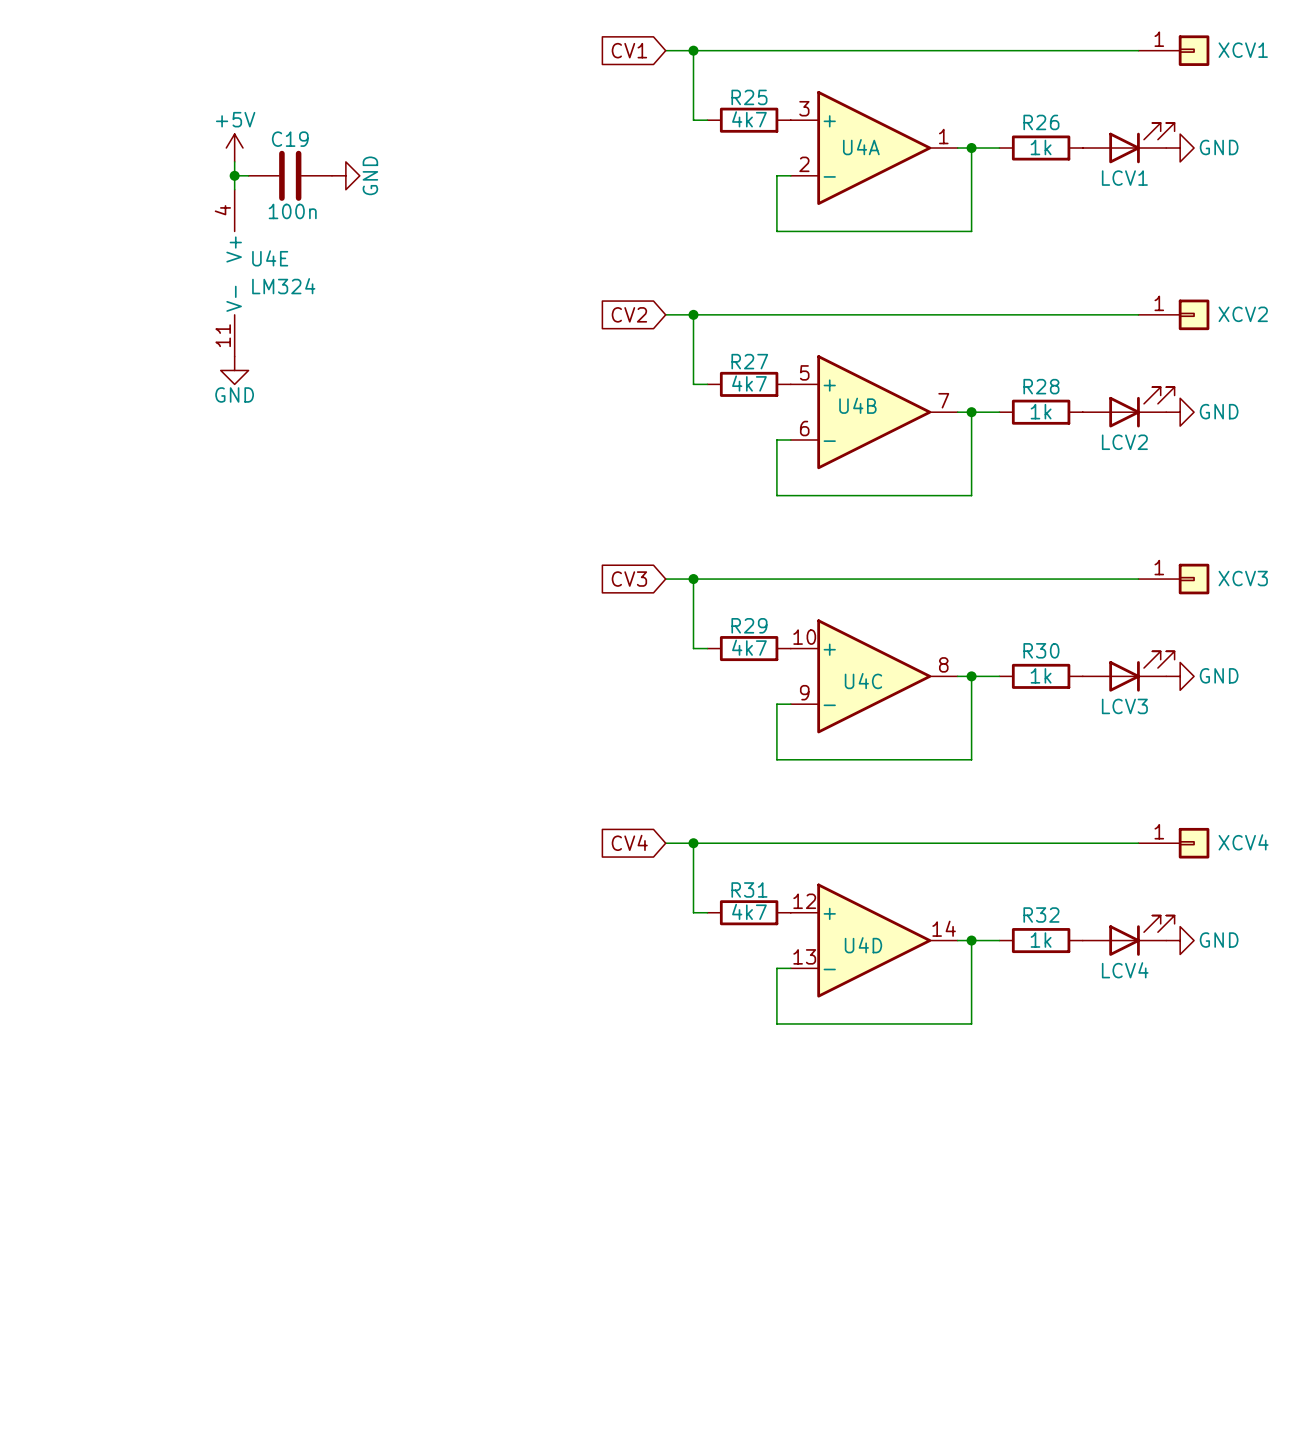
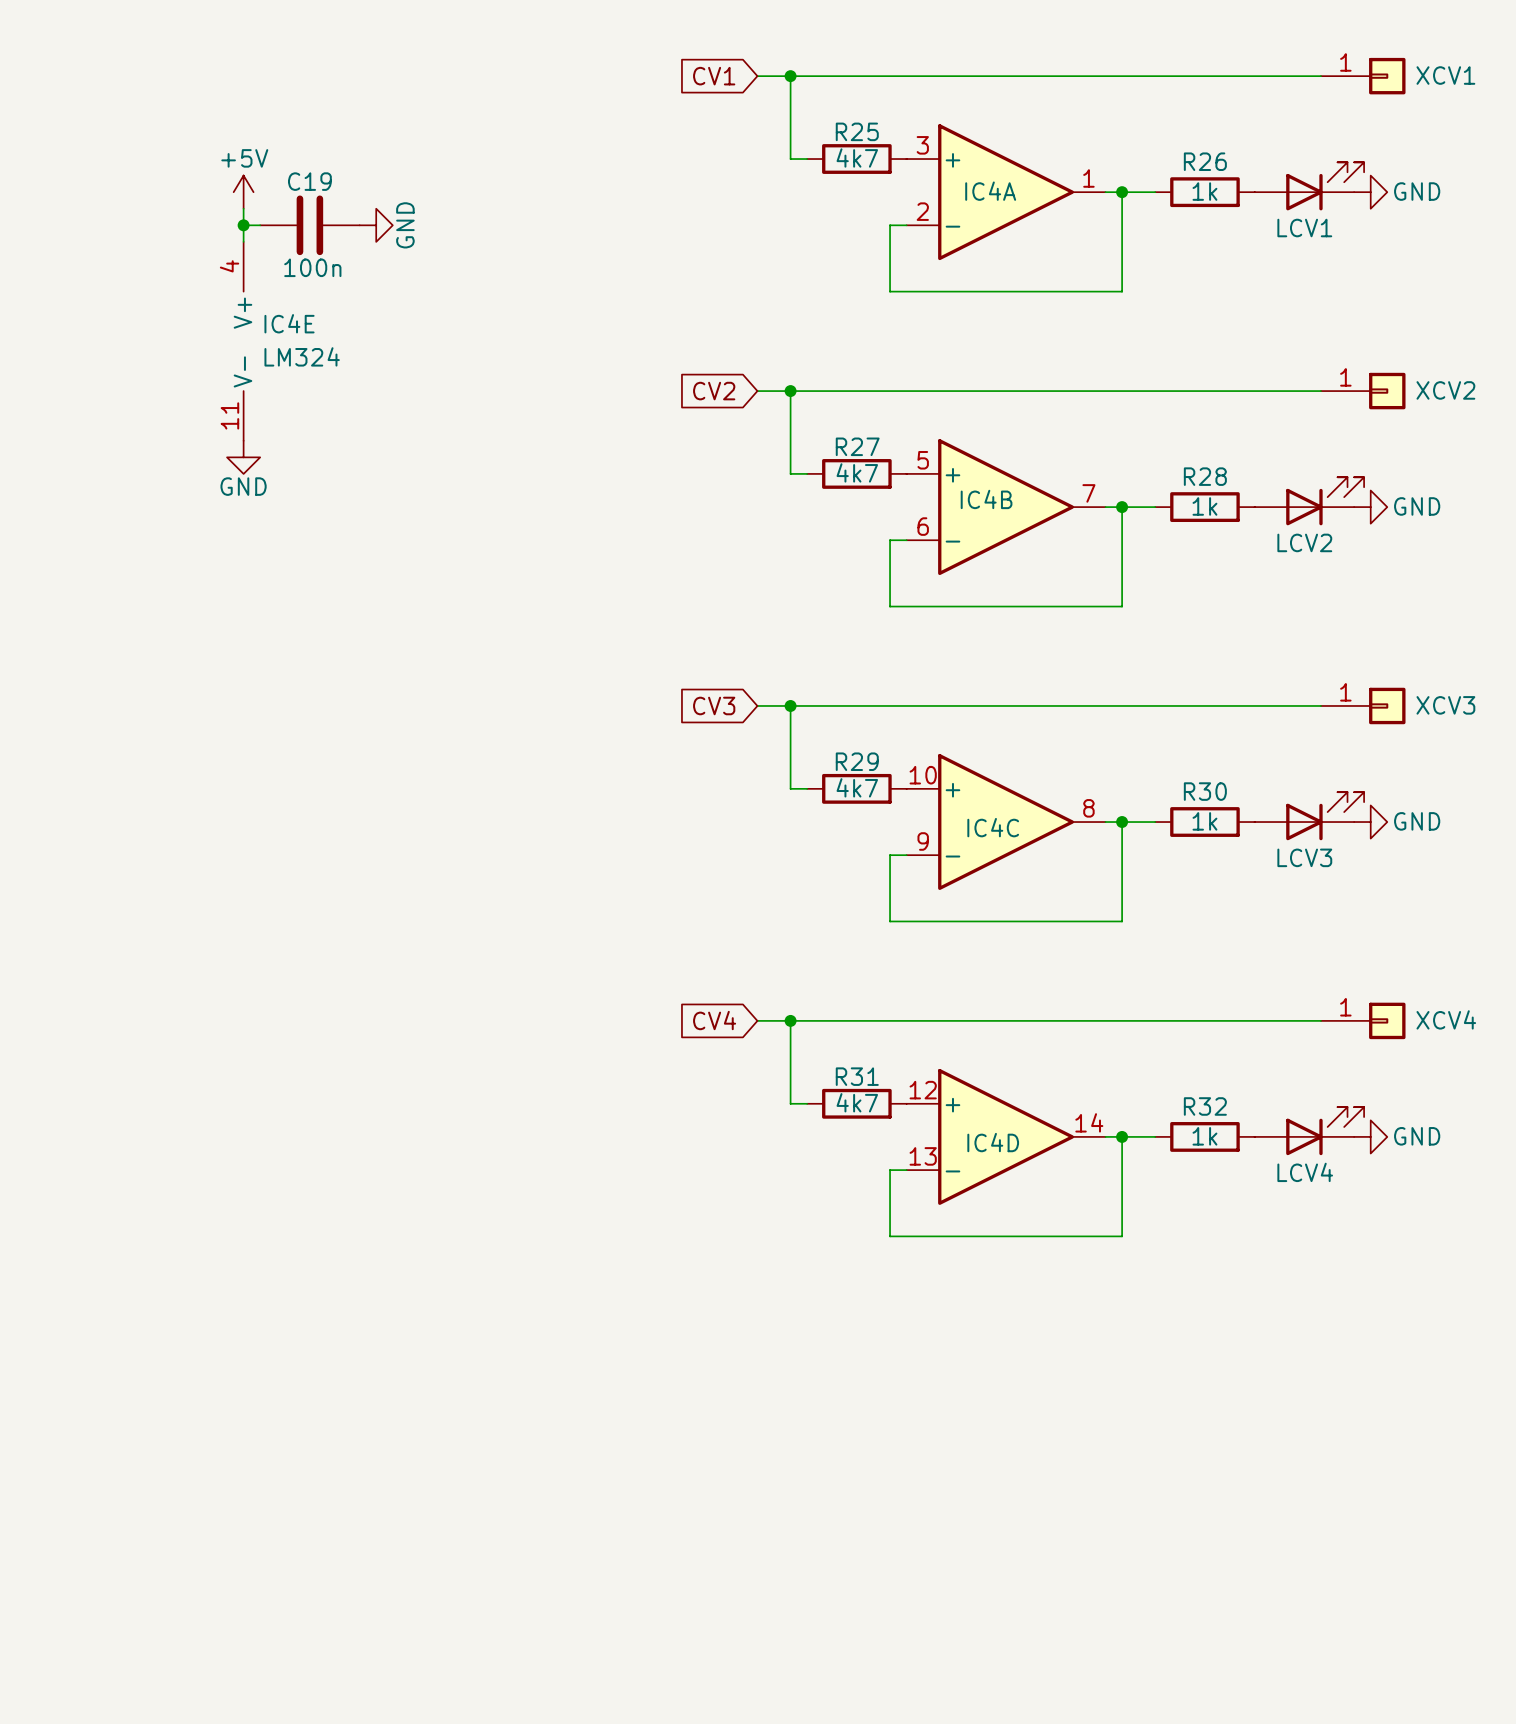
U4A name: U4A (861, 147) -> IC4A (990, 191)
U4E name: U4E (270, 258) -> IC4E (289, 323)
U4B name: U4B (857, 405) -> IC4B (986, 499)
U4C name: U4C (863, 681) -> IC4C (993, 827)
U4D name: U4D (863, 945) -> IC4D (993, 1142)

